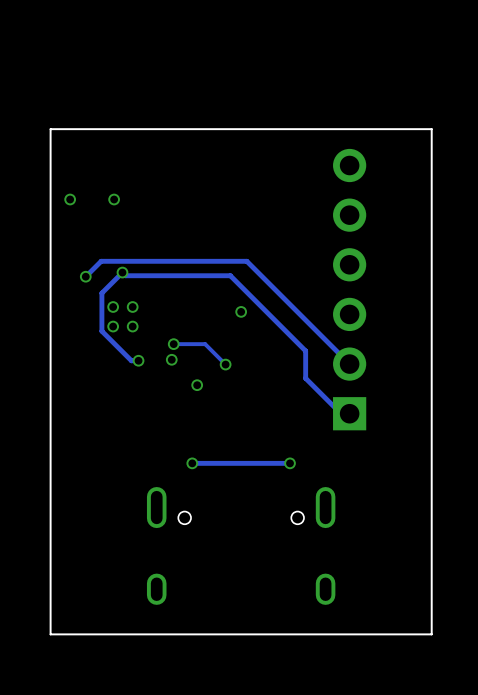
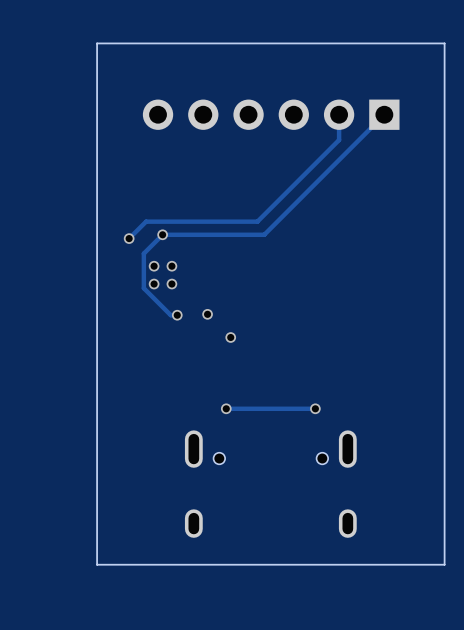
board edge: (431, 129) (50, 129) -> (444, 104) (444, 43) (97, 43) (97, 104)
via: (70, 199) -> none
via: (114, 199) -> none
track: (101, 261) (246, 261) (349, 364) -> (143, 224) (146, 221) (257, 221) (339, 140) (339, 114)
track: (122, 272) (125, 275) (230, 275) (305, 350) (305, 378) (341, 413) (349, 413) -> (162, 234) (264, 234) (384, 114)
part rotation: 0° (349, 289) -> 90° counterclockwise (271, 114)
part position: (349, 289) -> (271, 114)
via: (241, 311) -> none
track: (173, 344) (205, 344) (225, 364) -> none
via: (173, 344) -> none
via: (225, 364) -> none

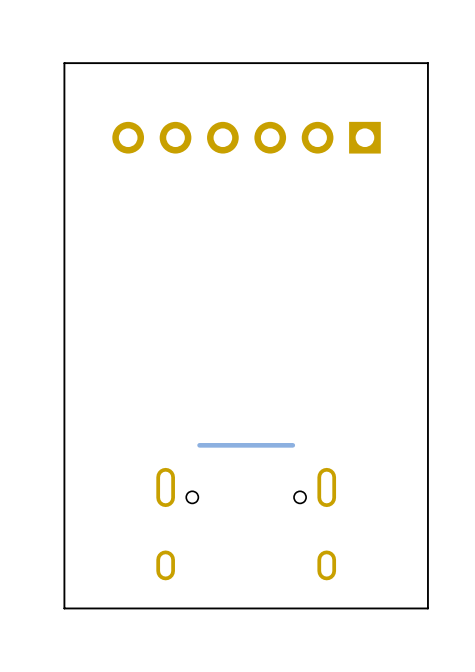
track: (339, 114) (339, 140) (257, 221) (146, 221) (129, 238) -> none
track: (384, 114) (264, 234) (162, 234) (143, 253) (143, 288) (170, 315) (177, 315) -> none
via: (162, 234) -> none
via: (129, 238) -> none
via: (154, 266) -> none
via: (171, 266) -> none
via: (154, 284) -> none
via: (171, 284) -> none
via: (207, 314) -> none
via: (177, 315) -> none
via: (230, 337) -> none
via: (226, 408) -> none
via: (315, 408) -> none

